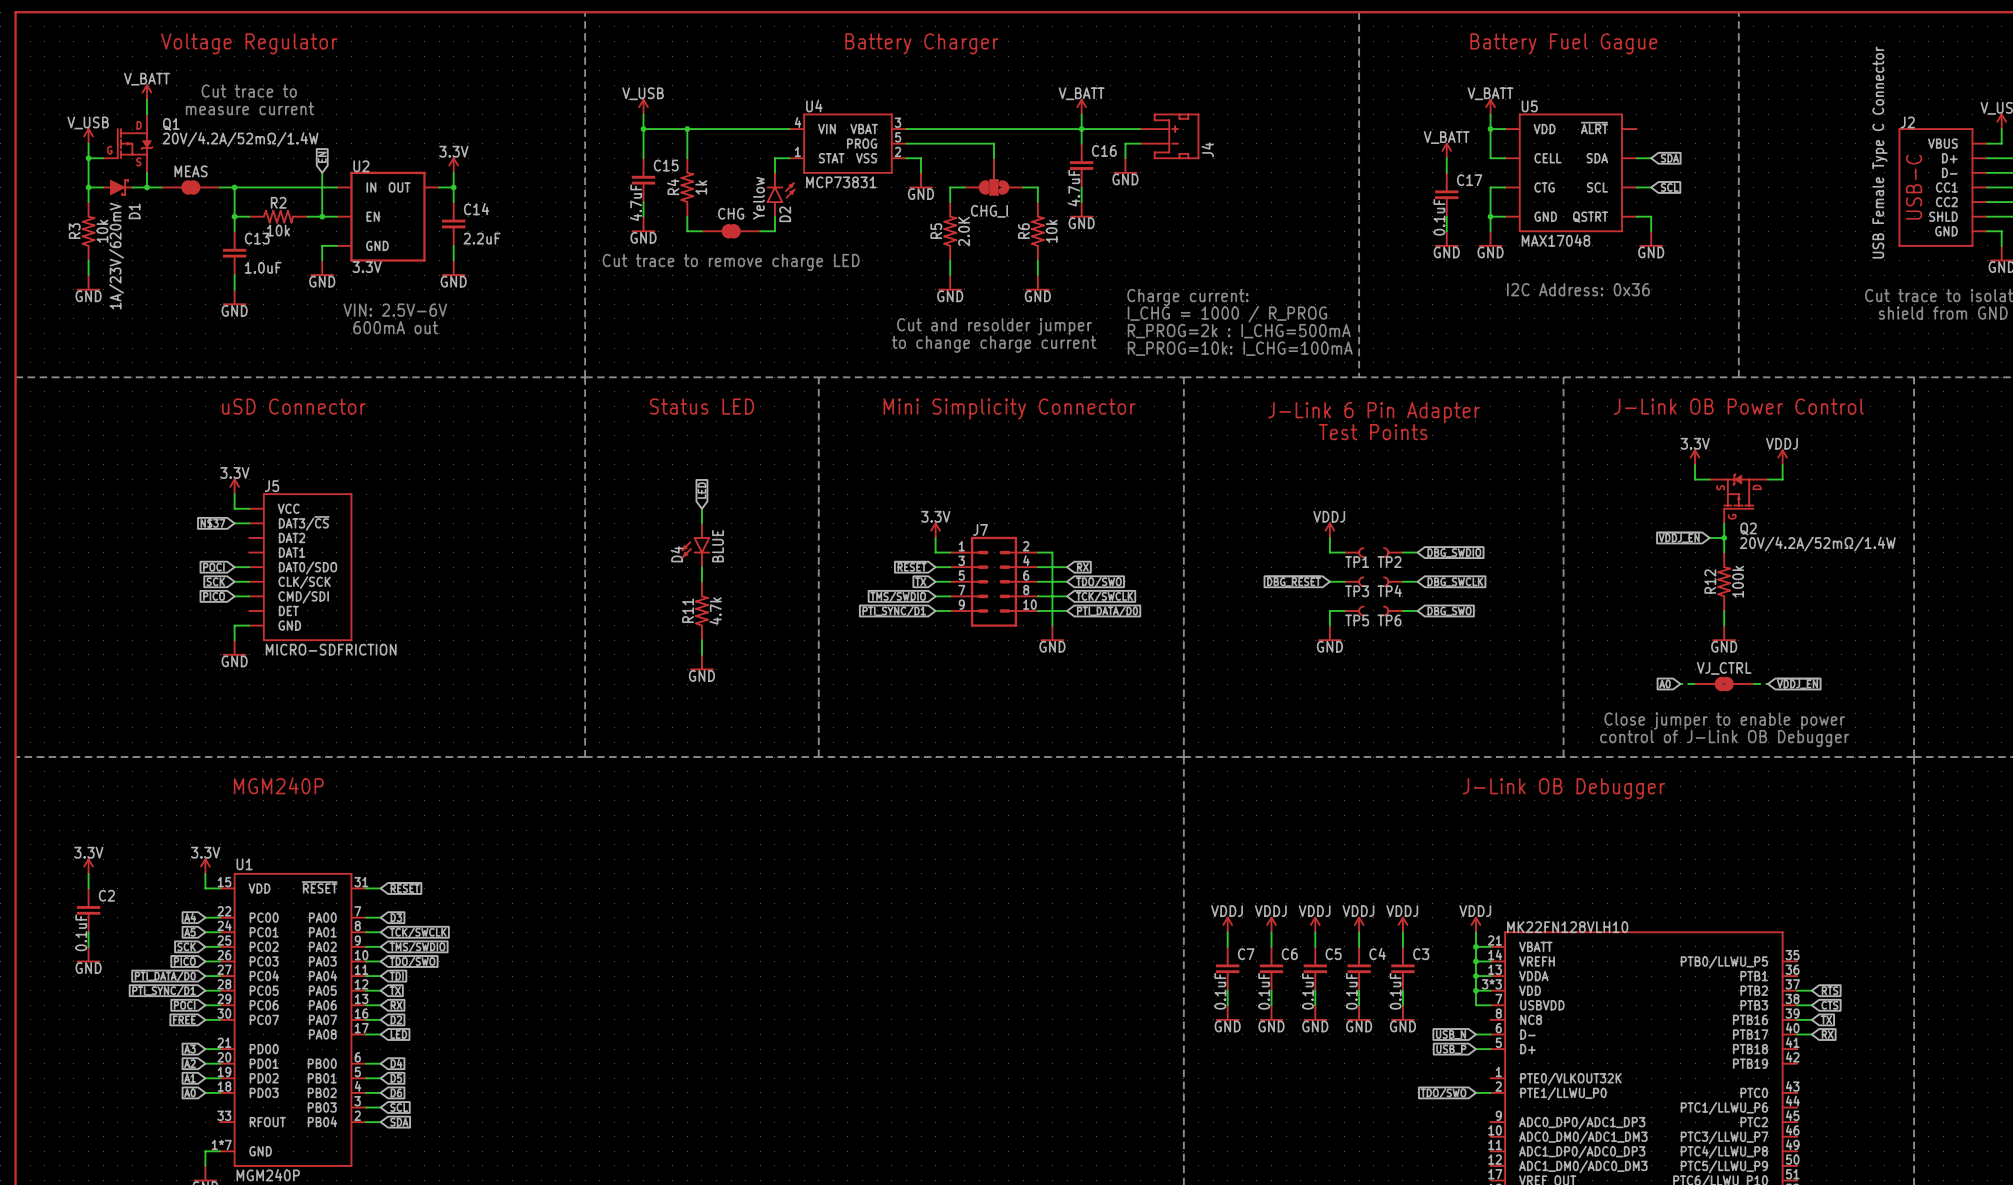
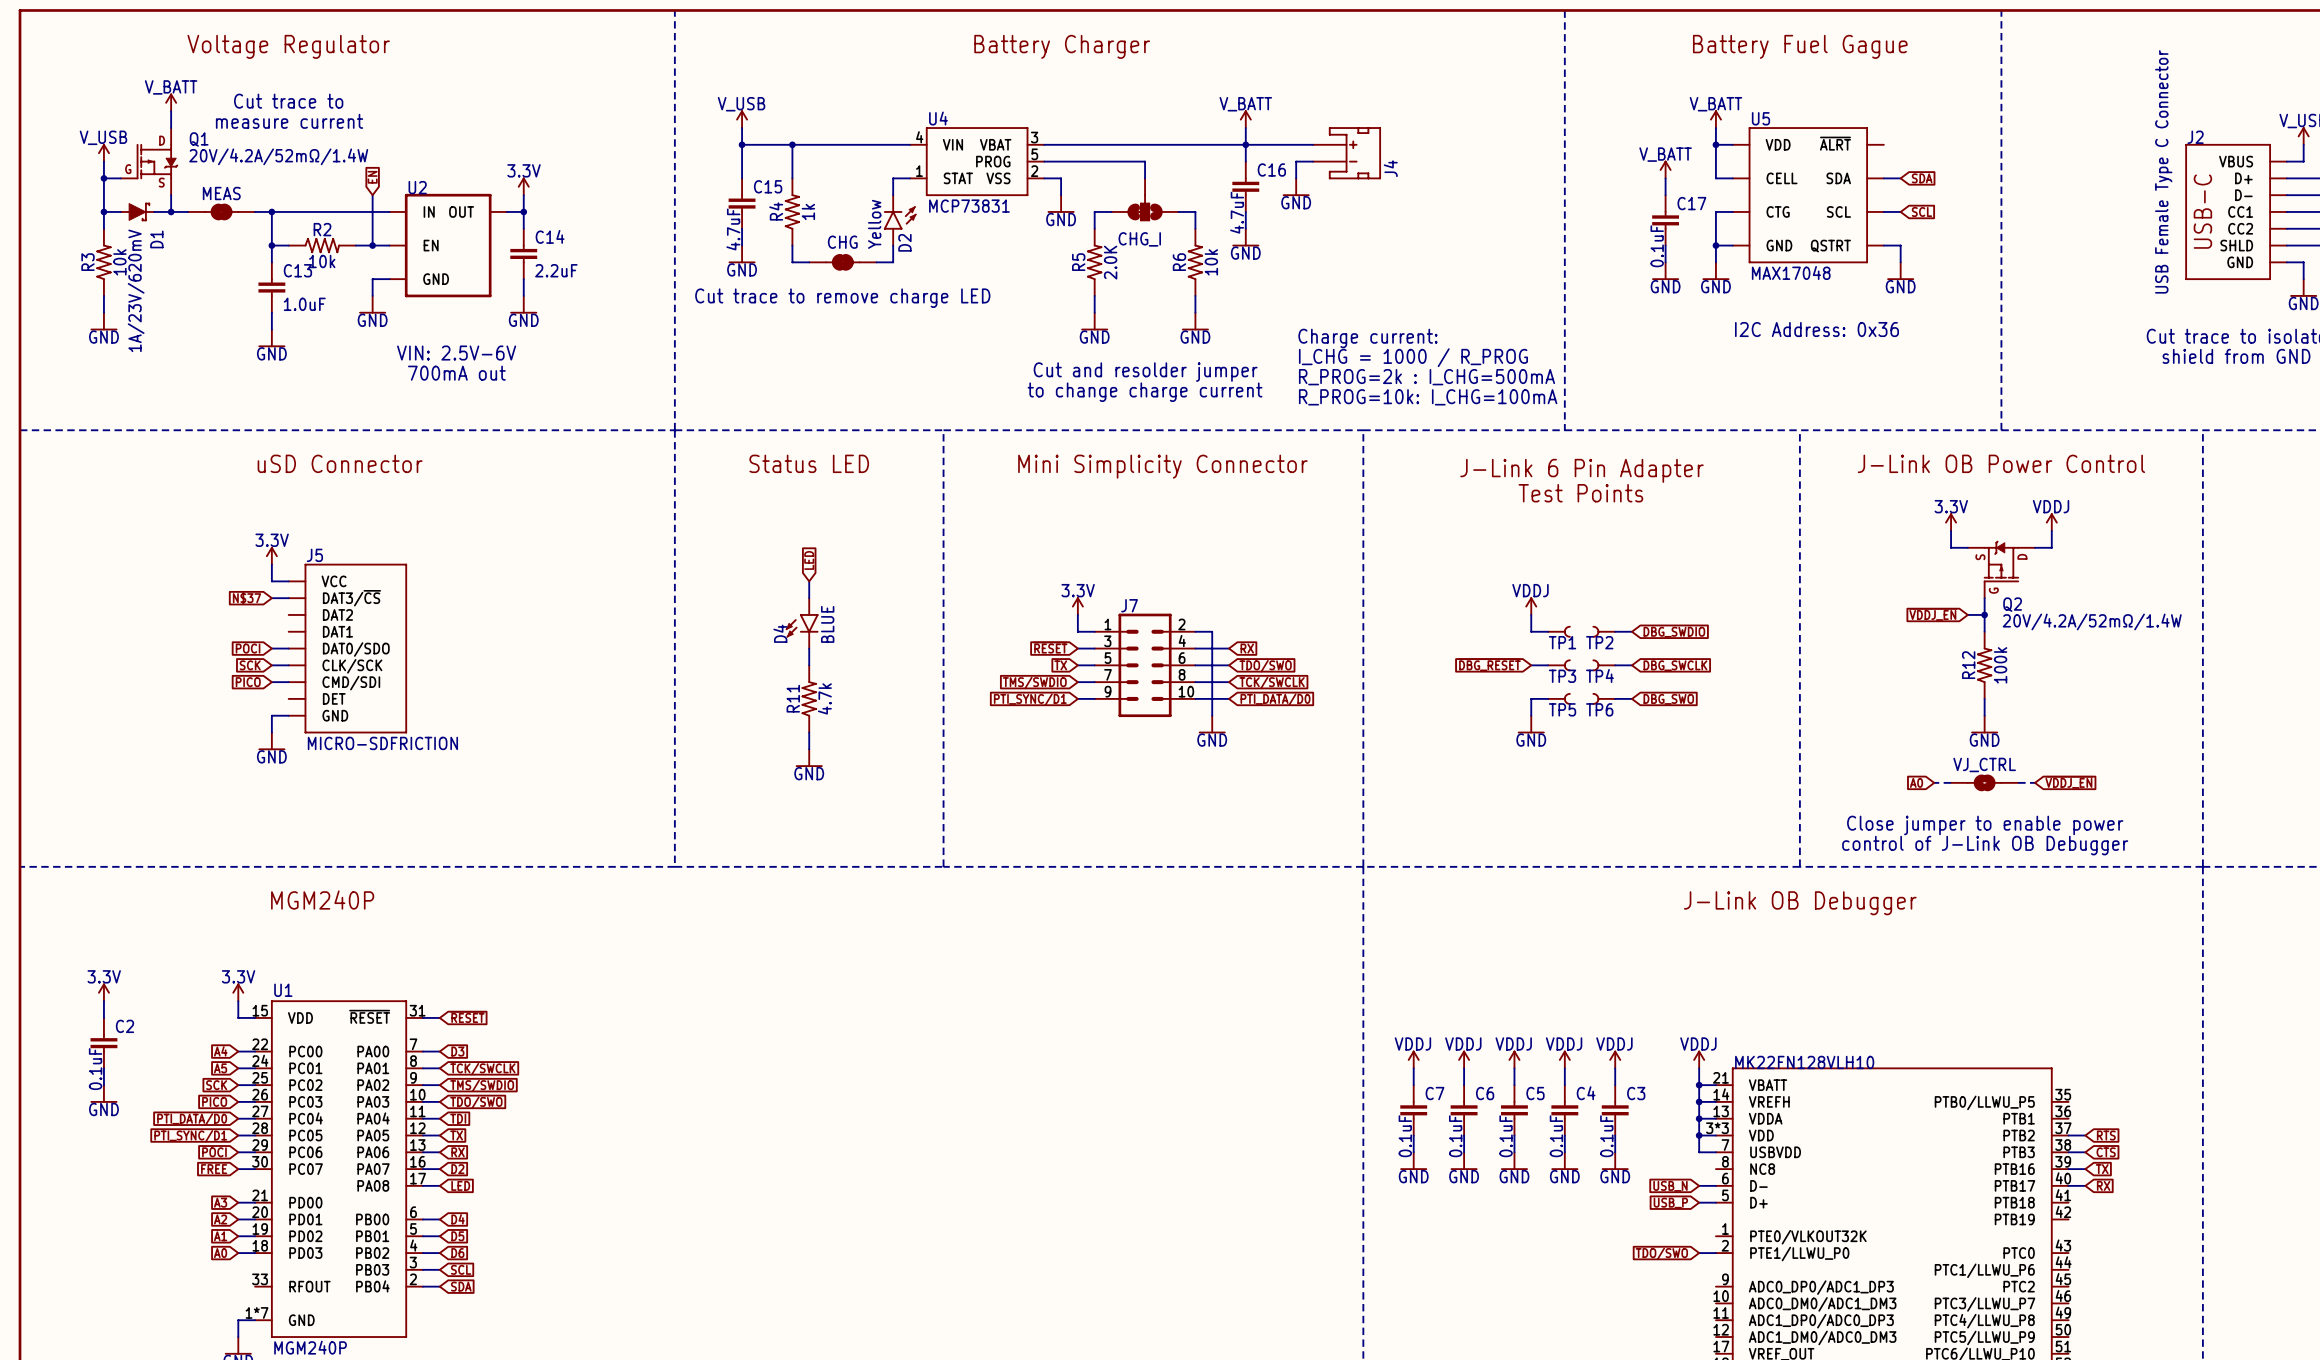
U2 value: 3.3V (367, 267) -> none
text: 600mA out (395, 327) -> 700mA out (456, 373)

